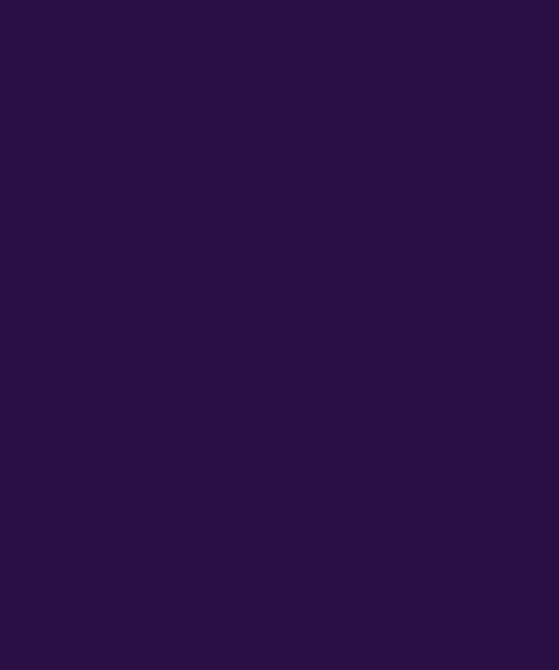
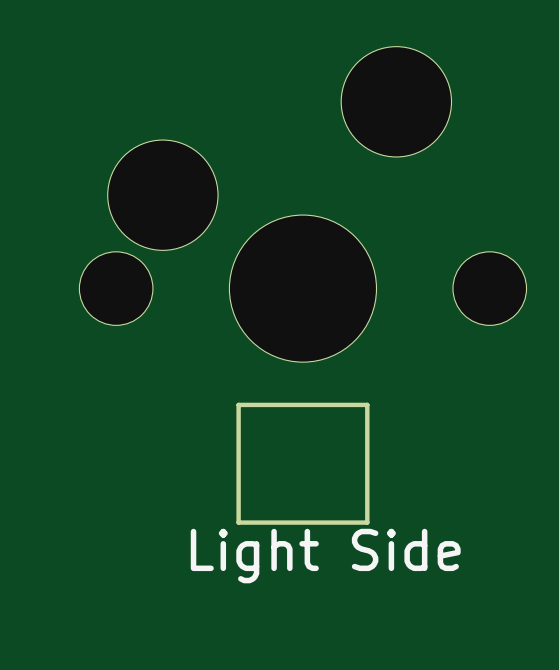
part: none -> (302, 204)
part: none -> (302, 463)

